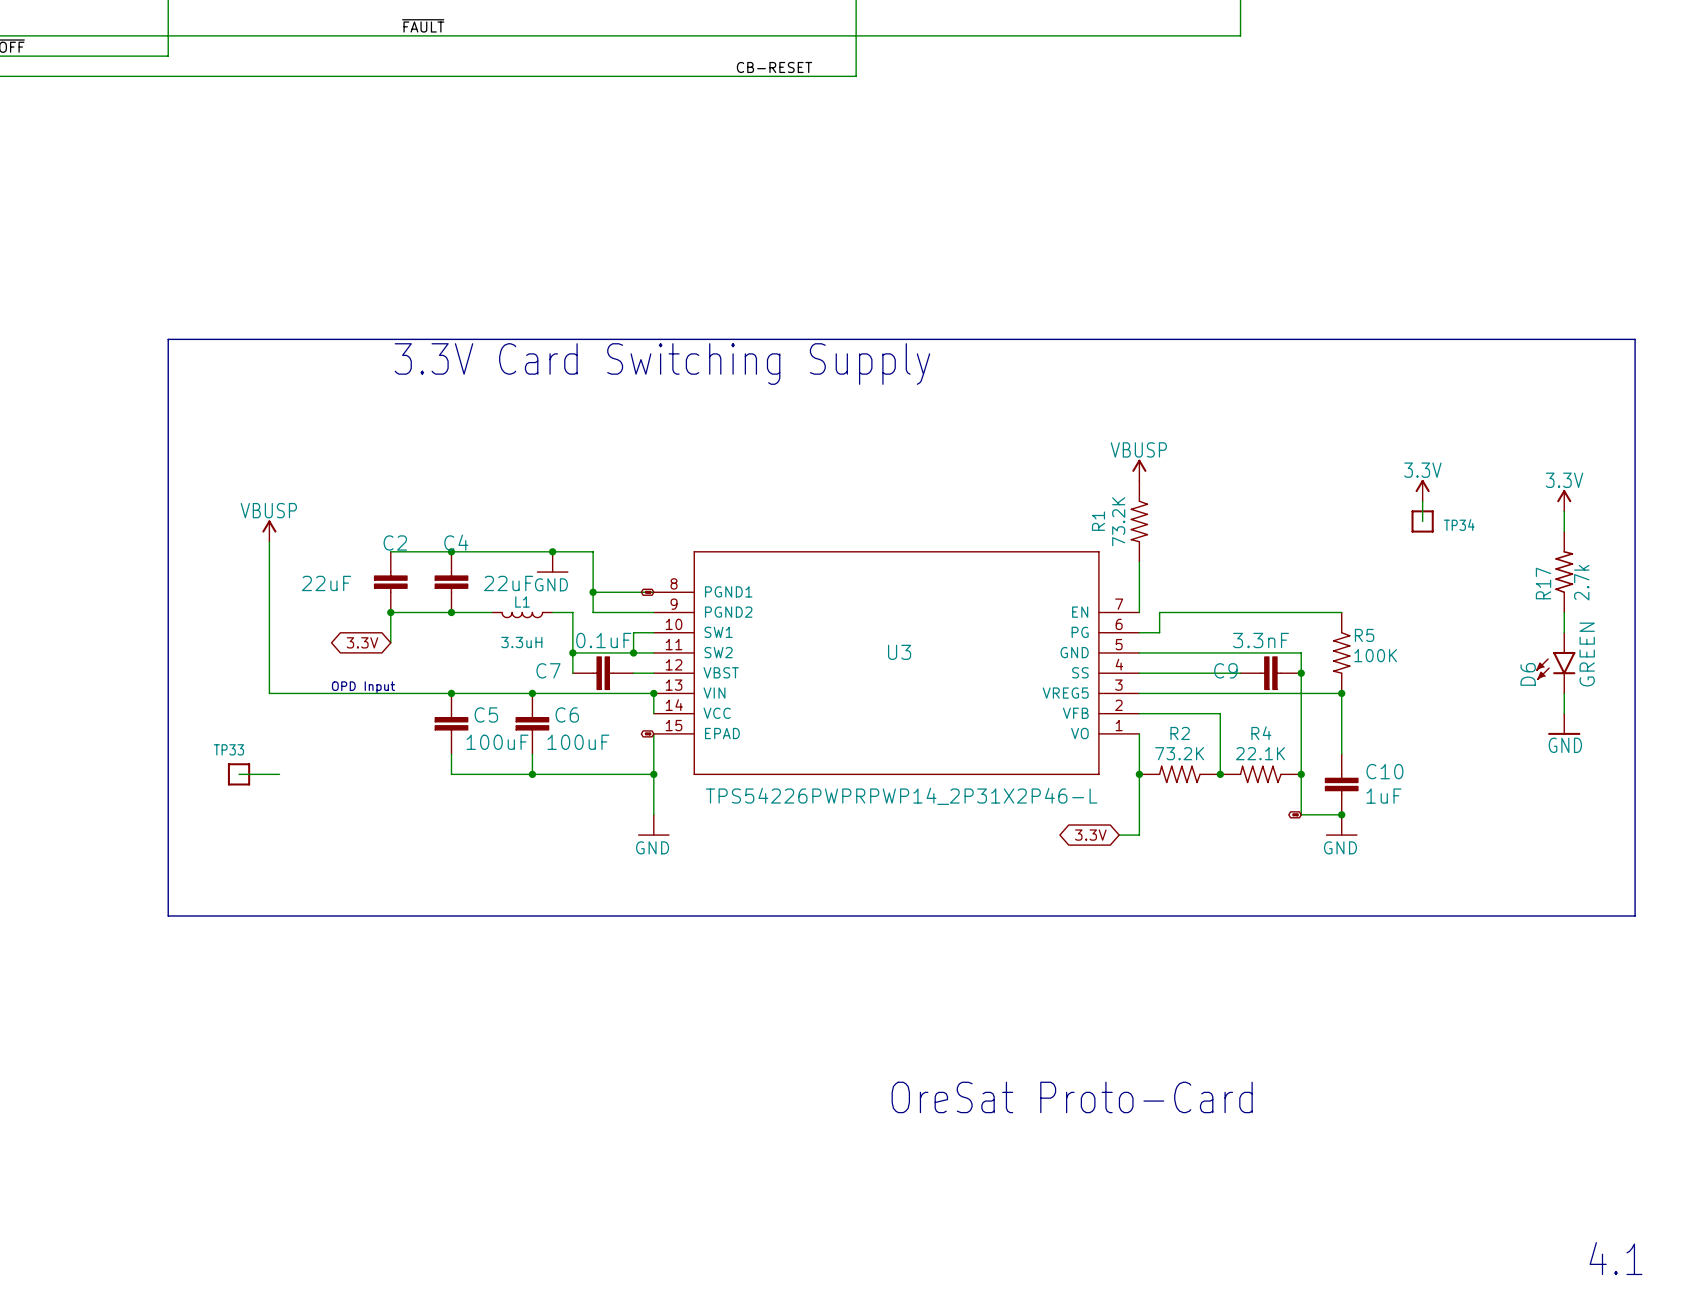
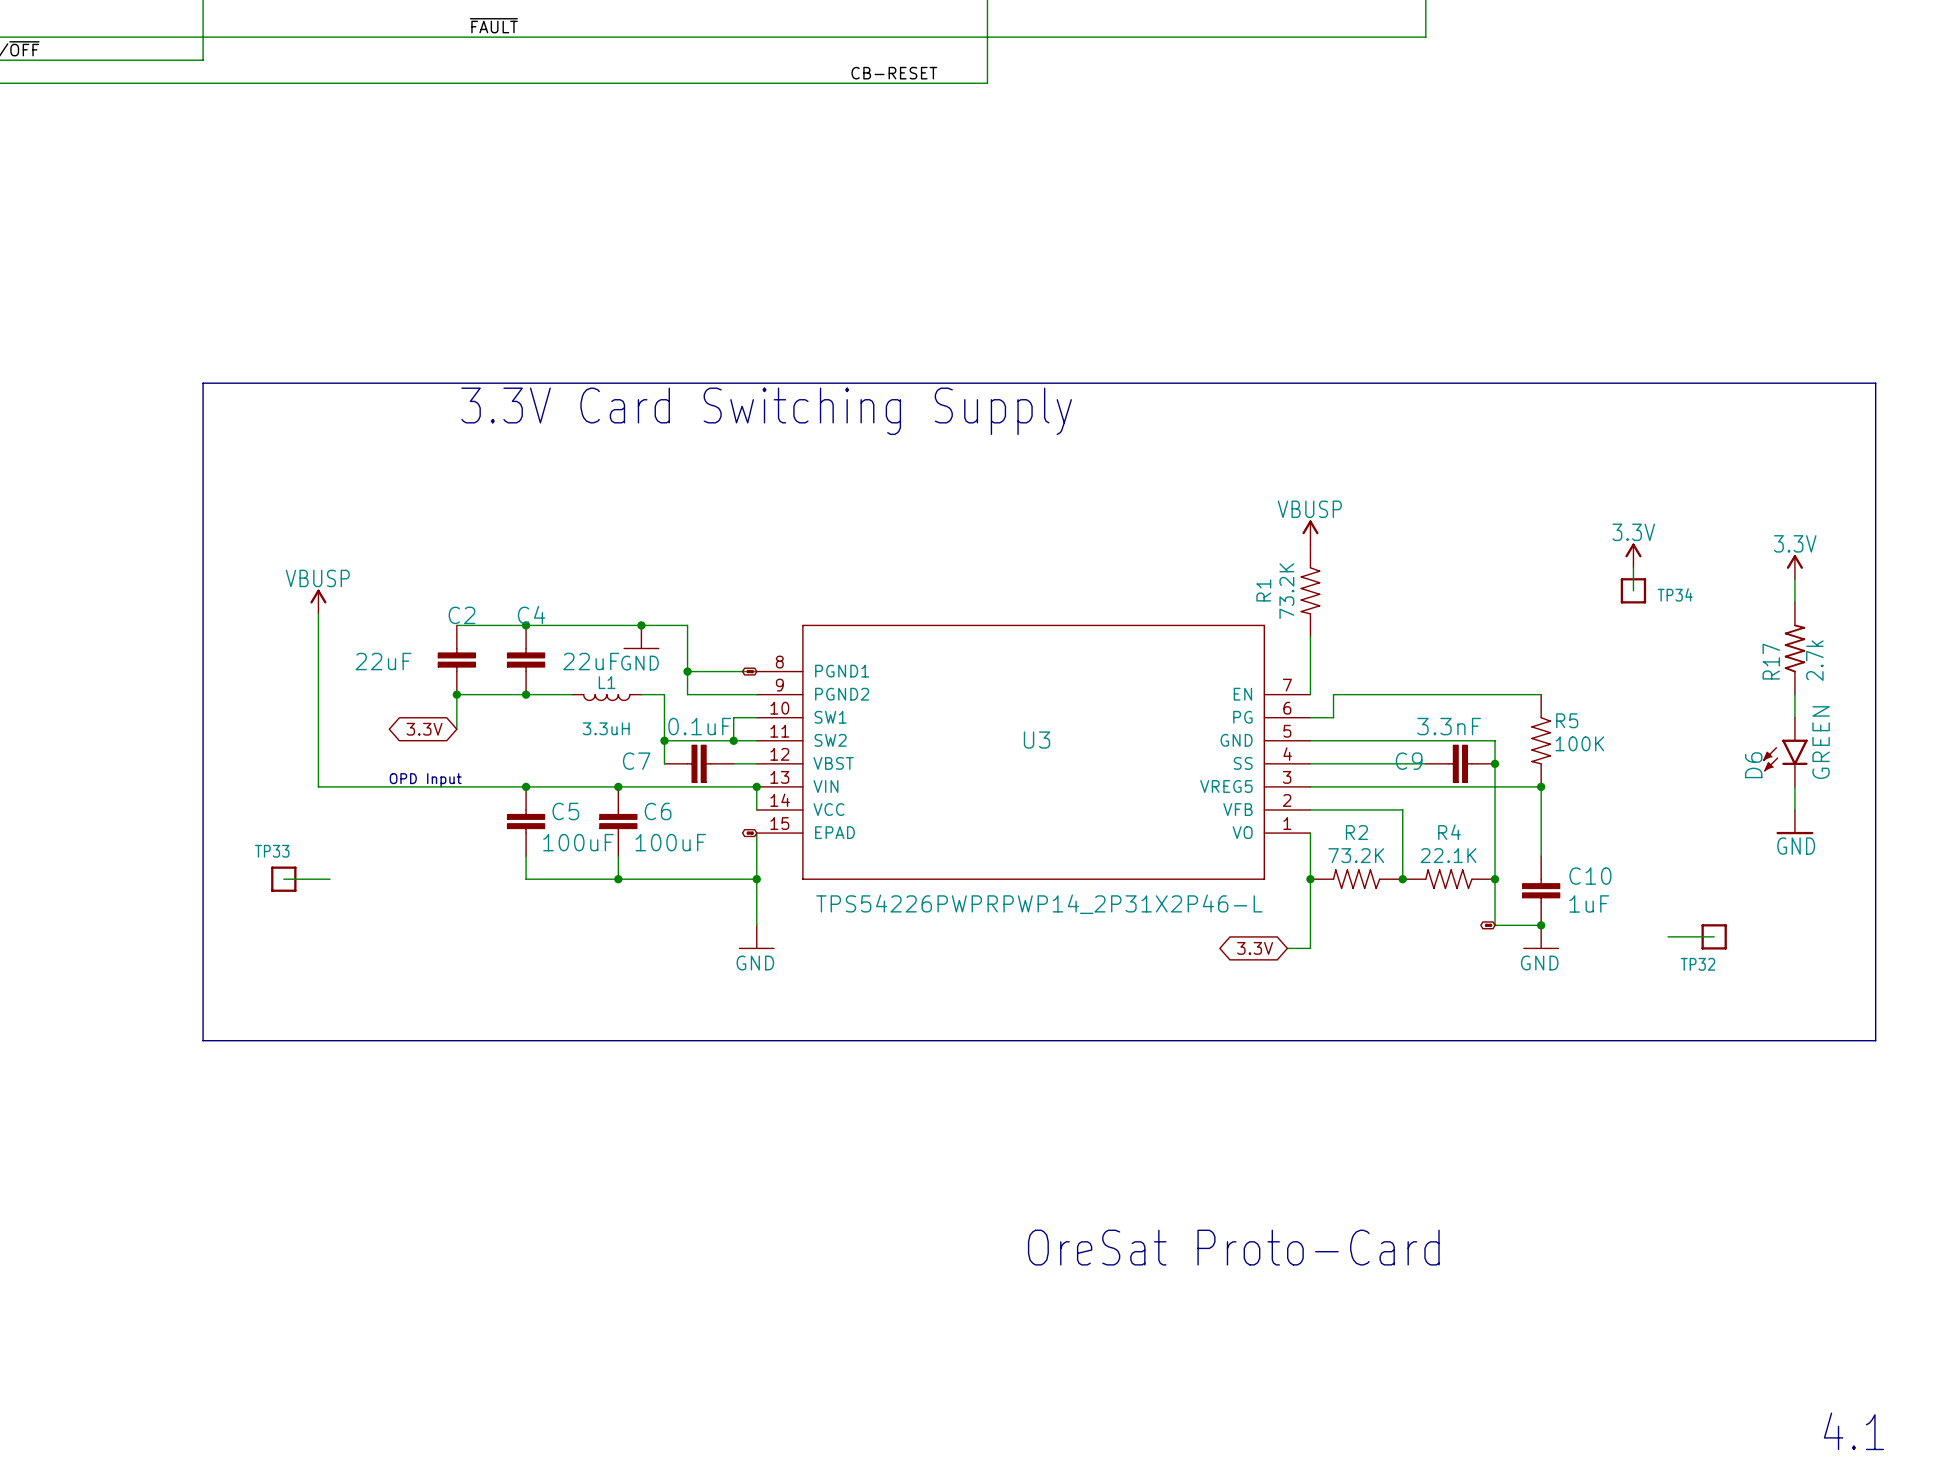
wire: none -> (1668, 936) (1714, 936)
TP32: none -> (1714, 936)

